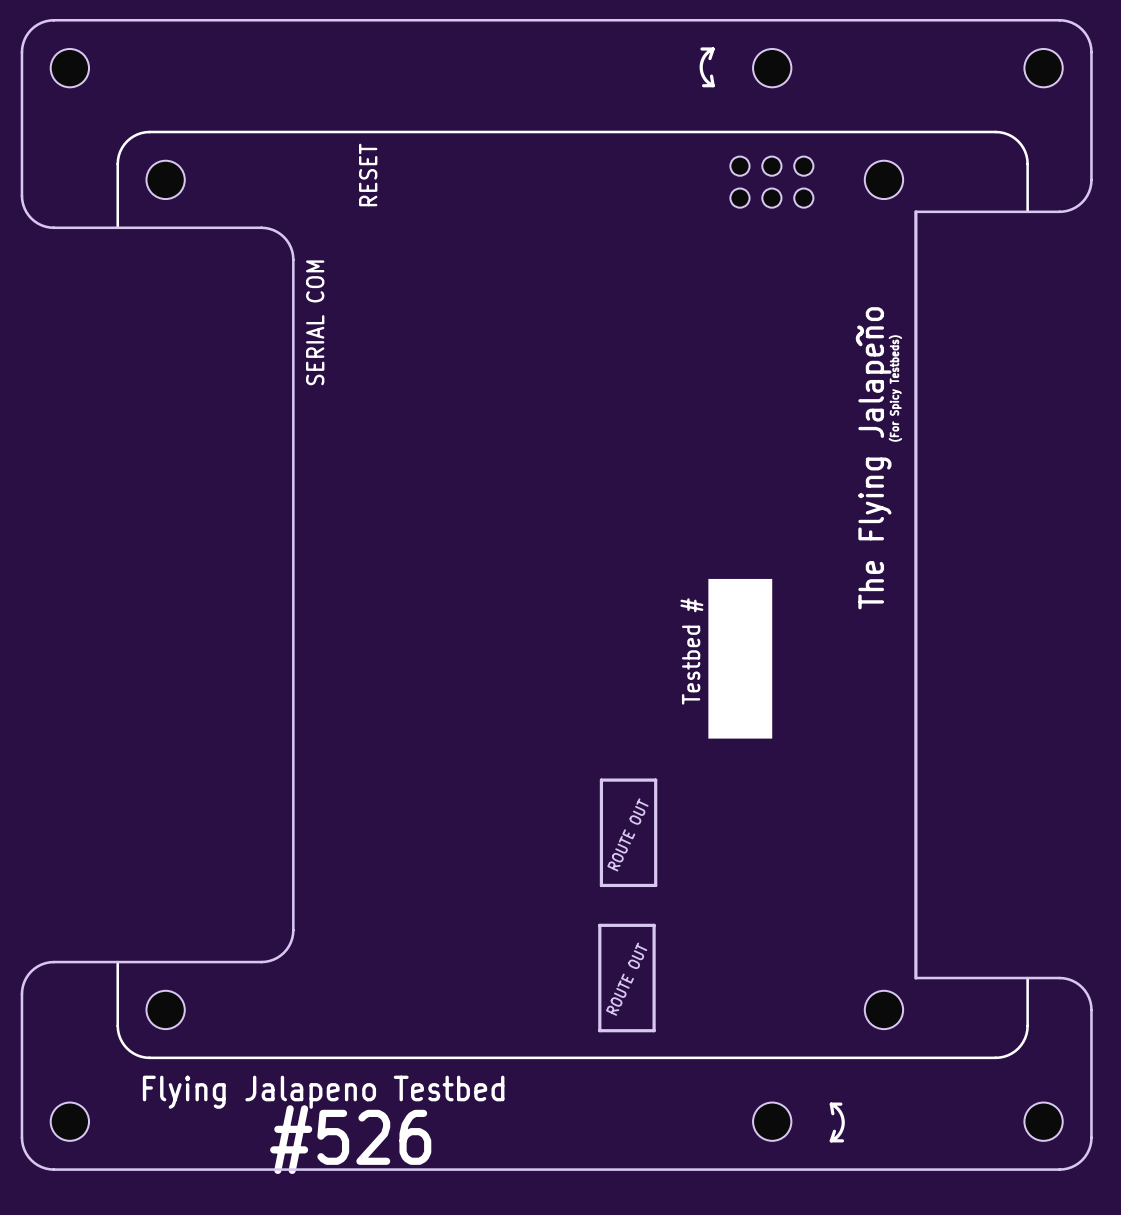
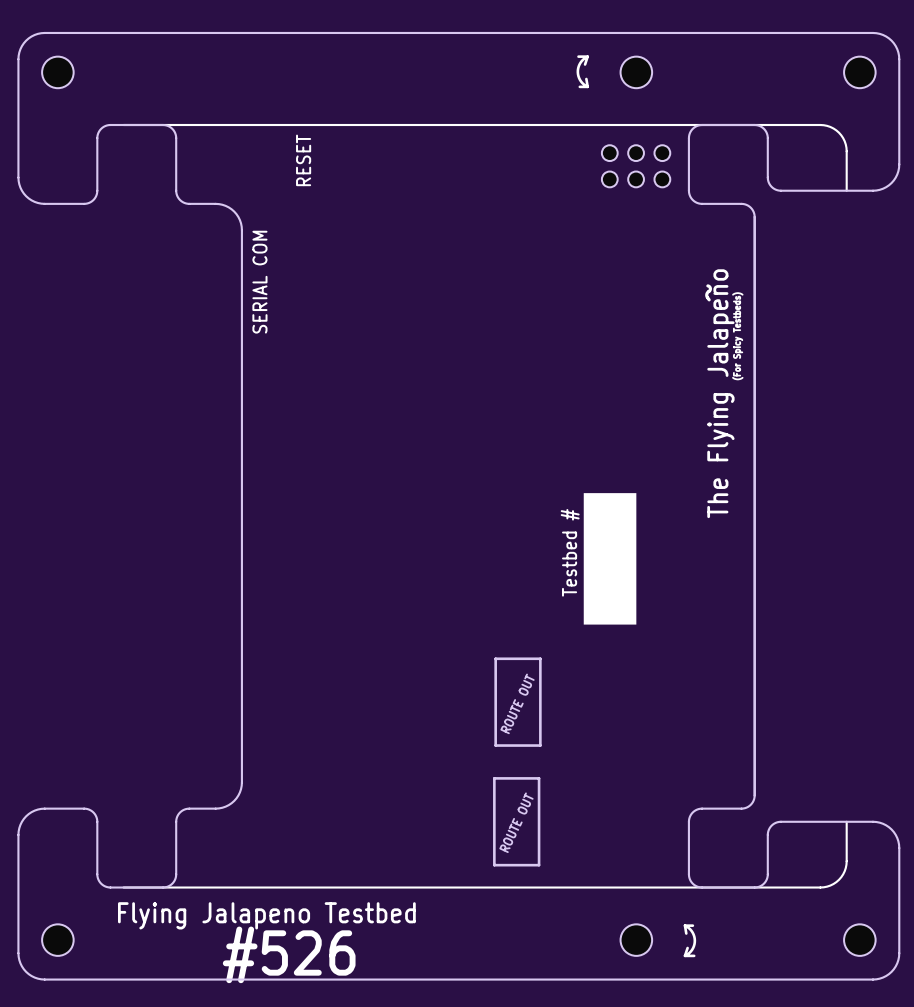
line: (149, 132) (141, 133) (130, 138) (124, 144) (118, 155) (117, 227) -> none
part: (165, 179) -> none
part: (883, 179) -> none
board edge: (947, 211) (915, 211) (915, 243) -> (780, 190) (772, 188) (768, 180) (767, 136) (762, 127) (754, 125) (702, 125) (692, 128) (688, 138) (688, 190) (691, 198) (700, 203) (744, 204) (751, 209) (754, 217)
board edge: (101, 227) (229, 227) -> (84, 203) (92, 201) (97, 192) (97, 134) (102, 127) (110, 125) (163, 125) (172, 128) (176, 136) (176, 194) (181, 201) (189, 203)
board edge: (915, 946) (915, 978) (947, 978) -> (754, 795) (751, 803) (744, 808) (700, 808) (691, 813) (688, 821) (688, 874) (692, 883) (702, 887) (754, 887) (762, 884) (767, 876) (768, 831) (772, 824) (780, 821)
board edge: (101, 962) (229, 962) -> (84, 808) (92, 811) (97, 820) (97, 877) (102, 884) (110, 887) (163, 887) (172, 883) (176, 876) (176, 818) (181, 811) (189, 808)
line: (117, 962) (118, 1034) (124, 1045) (130, 1051) (141, 1056) (149, 1057) -> none
part: (165, 1009) -> none
part: (883, 1009) -> none

